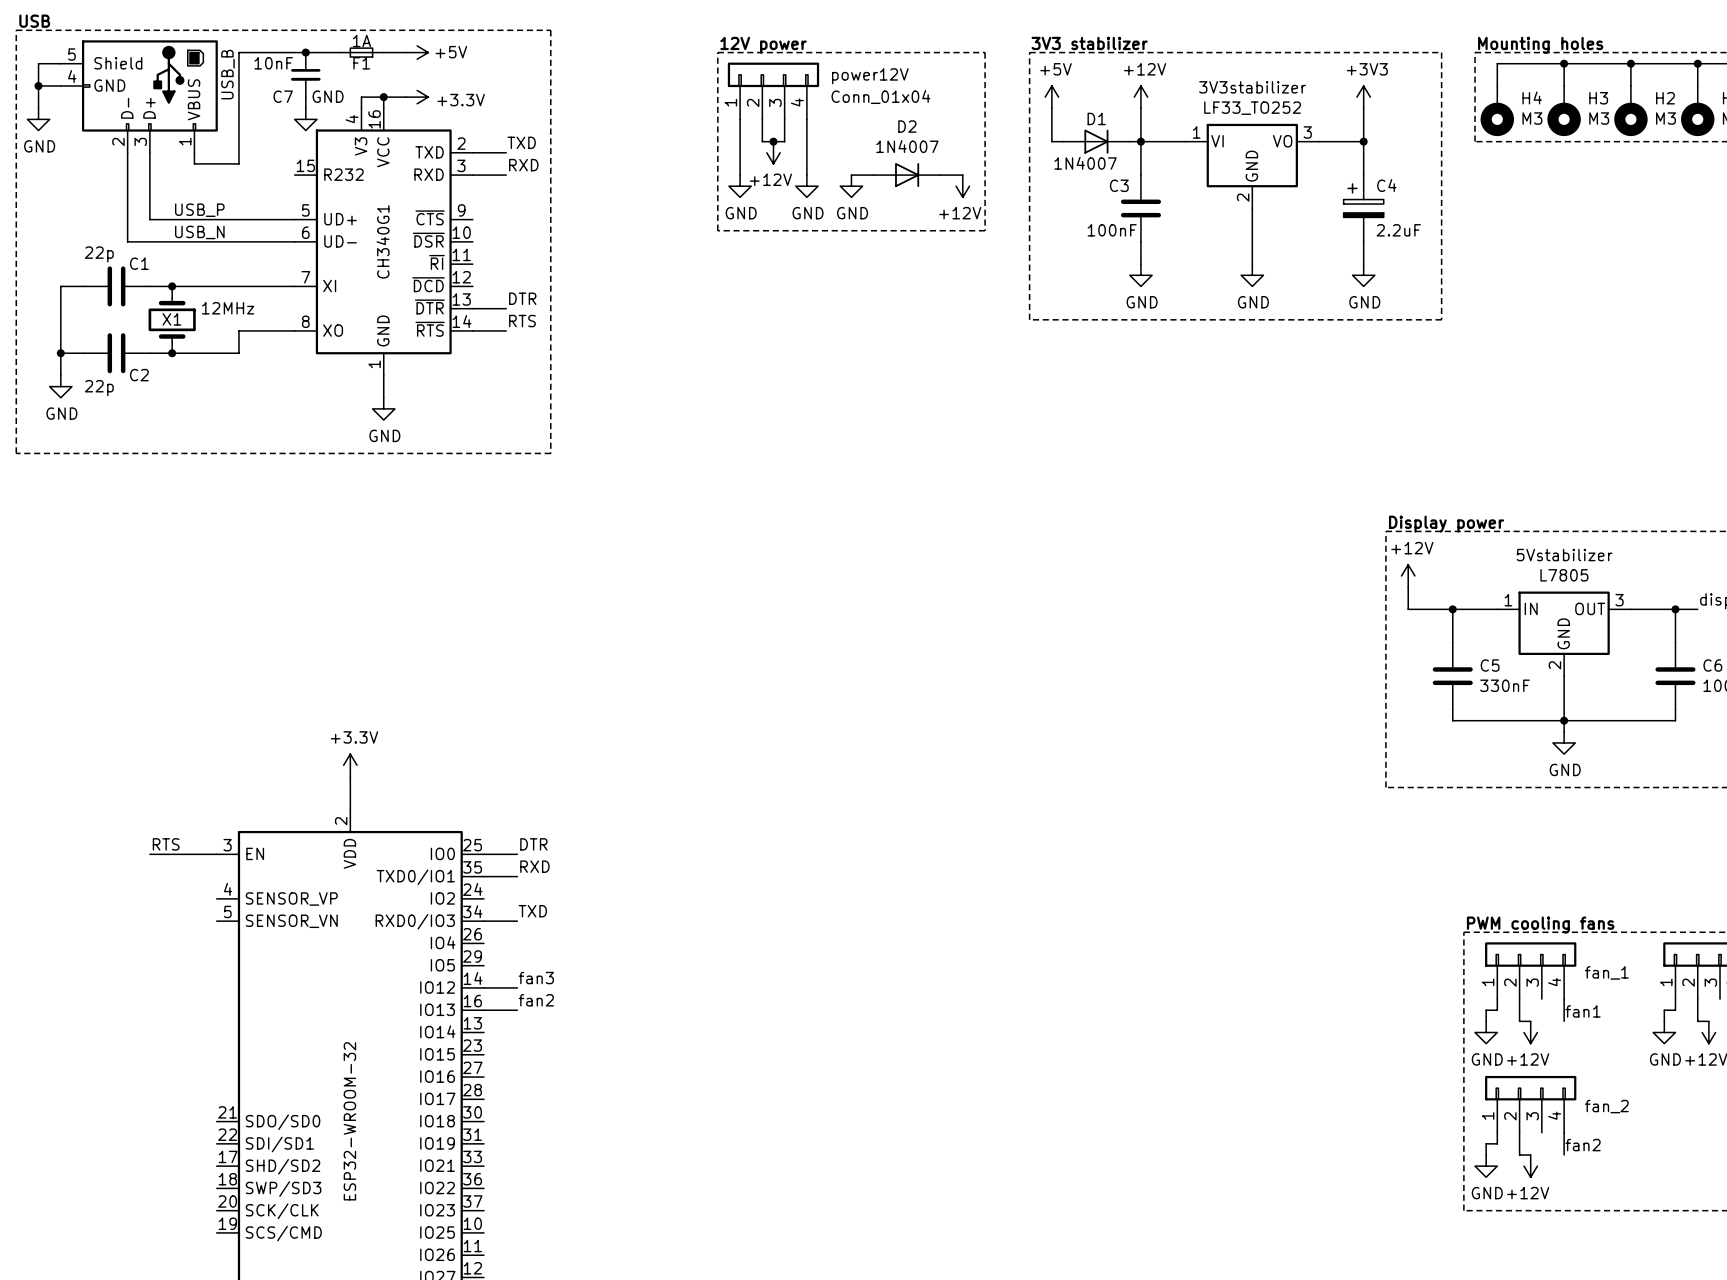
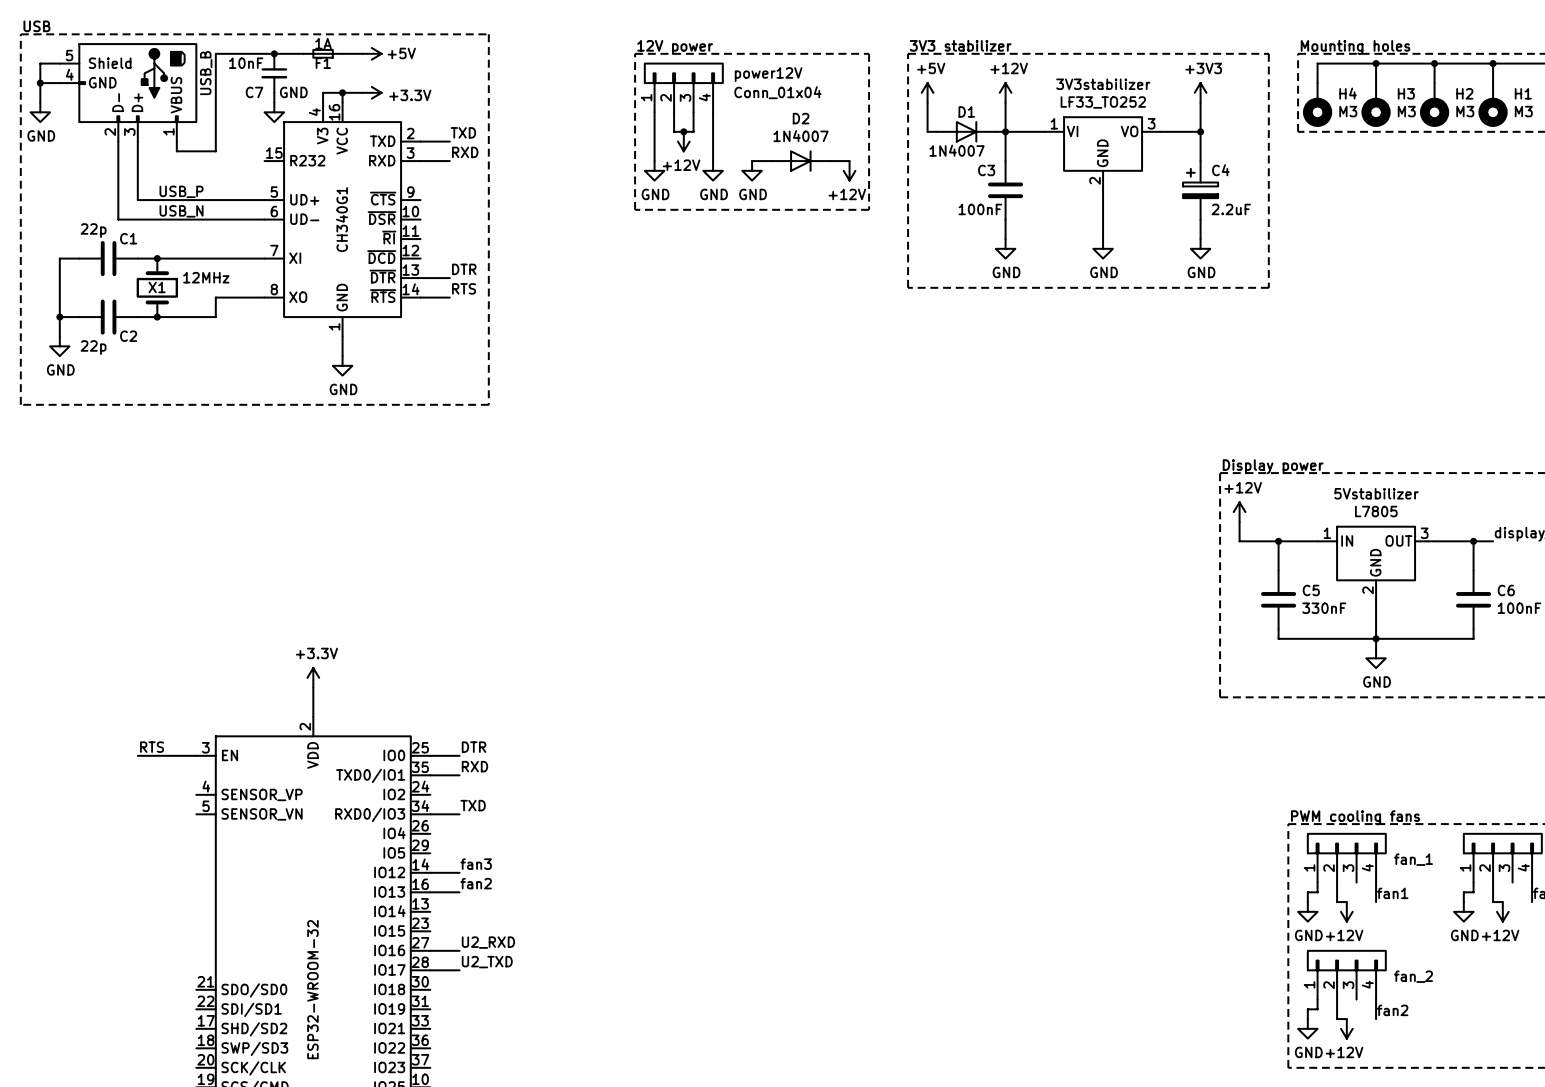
label: none -> U2_RXD (488, 942)
wire: none -> (430, 950) (459, 950)
label: none -> U2_TXD (487, 962)
wire: none -> (430, 970) (459, 970)

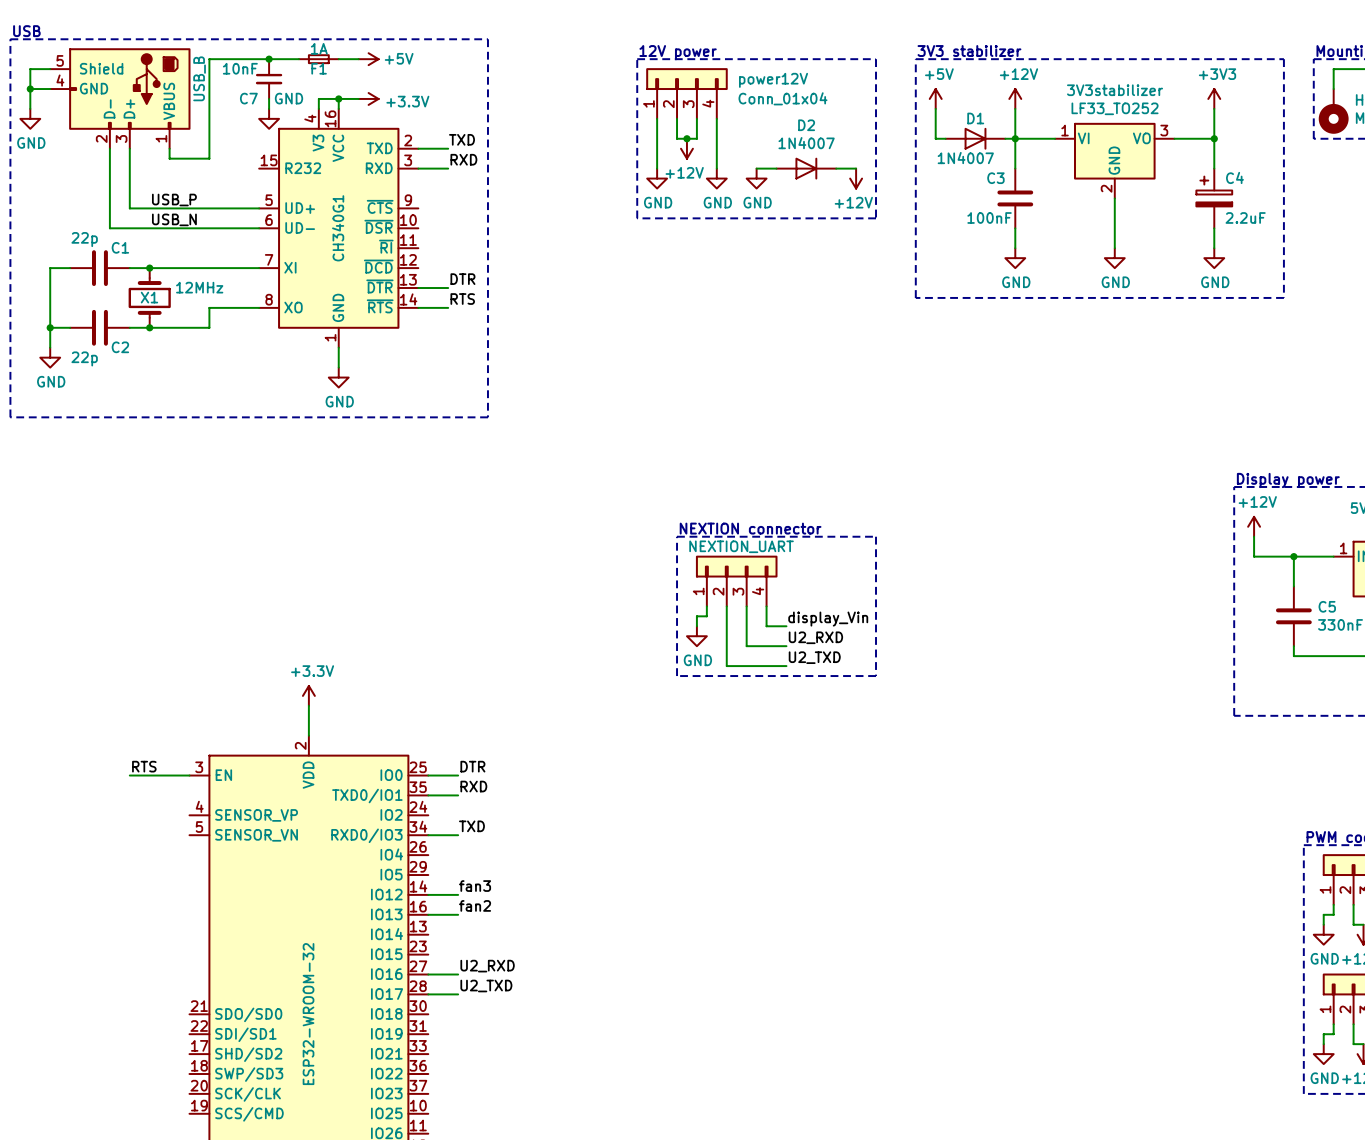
text: none -> NEXTION connector (750, 528)
line: none -> (677, 536) (677, 676) (876, 676) (876, 536) (677, 536)
NEXTION_UART: none -> (736, 581)
wire: none -> (706, 606) (706, 616) (696, 616) (696, 626)
wire: none -> (726, 606) (726, 666) (786, 666)
wire: none -> (746, 606) (746, 646) (786, 646)
wire: none -> (766, 606) (766, 626) (786, 626)
label: none -> display_Vin (828, 619)
power symbol: none -> GND (696, 636)
label: none -> U2_RXD (815, 637)
label: none -> U2_TXD (814, 657)

